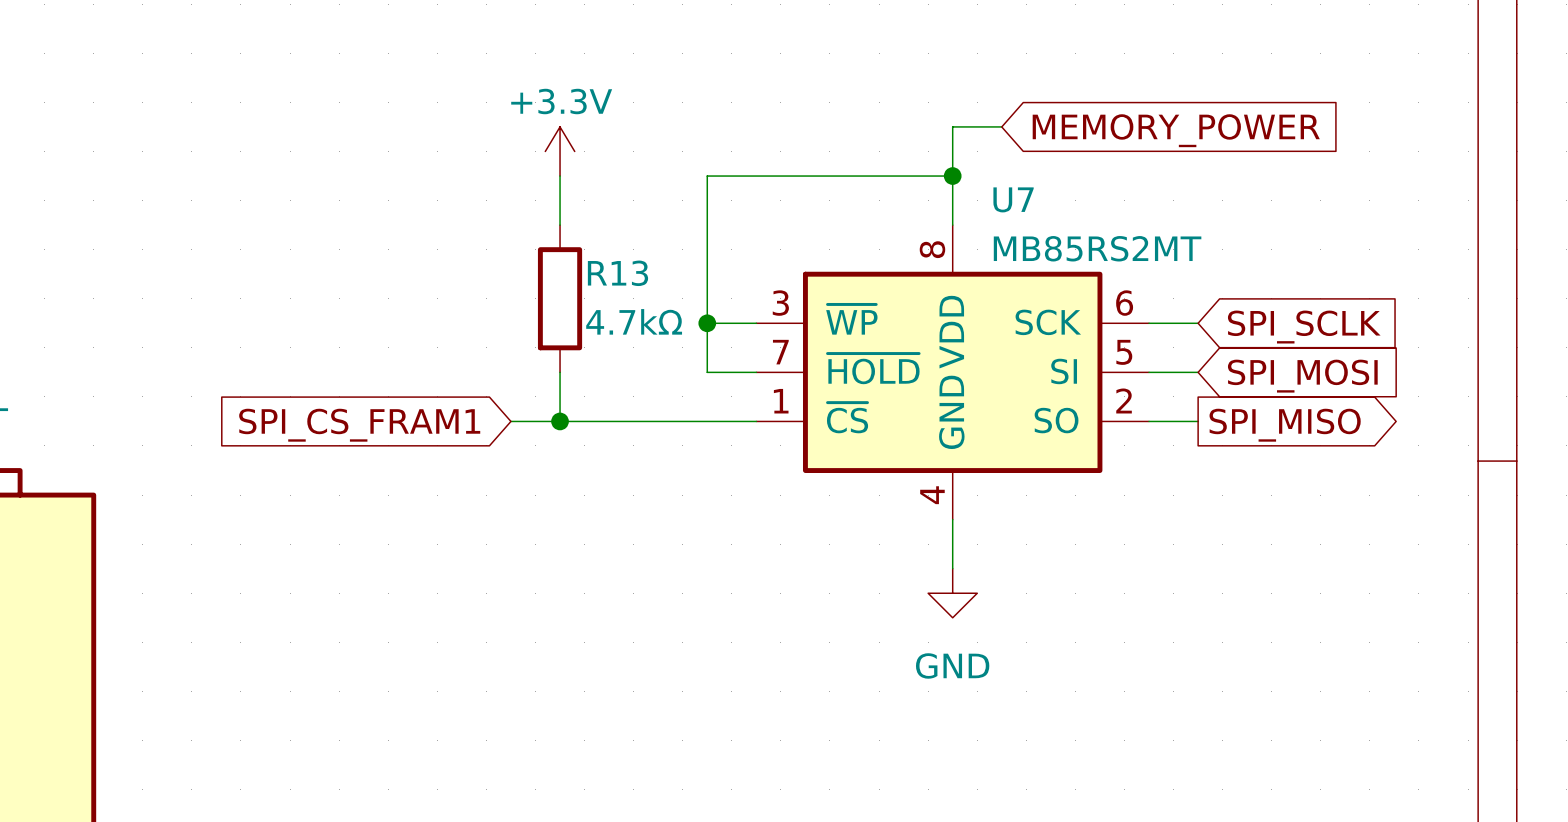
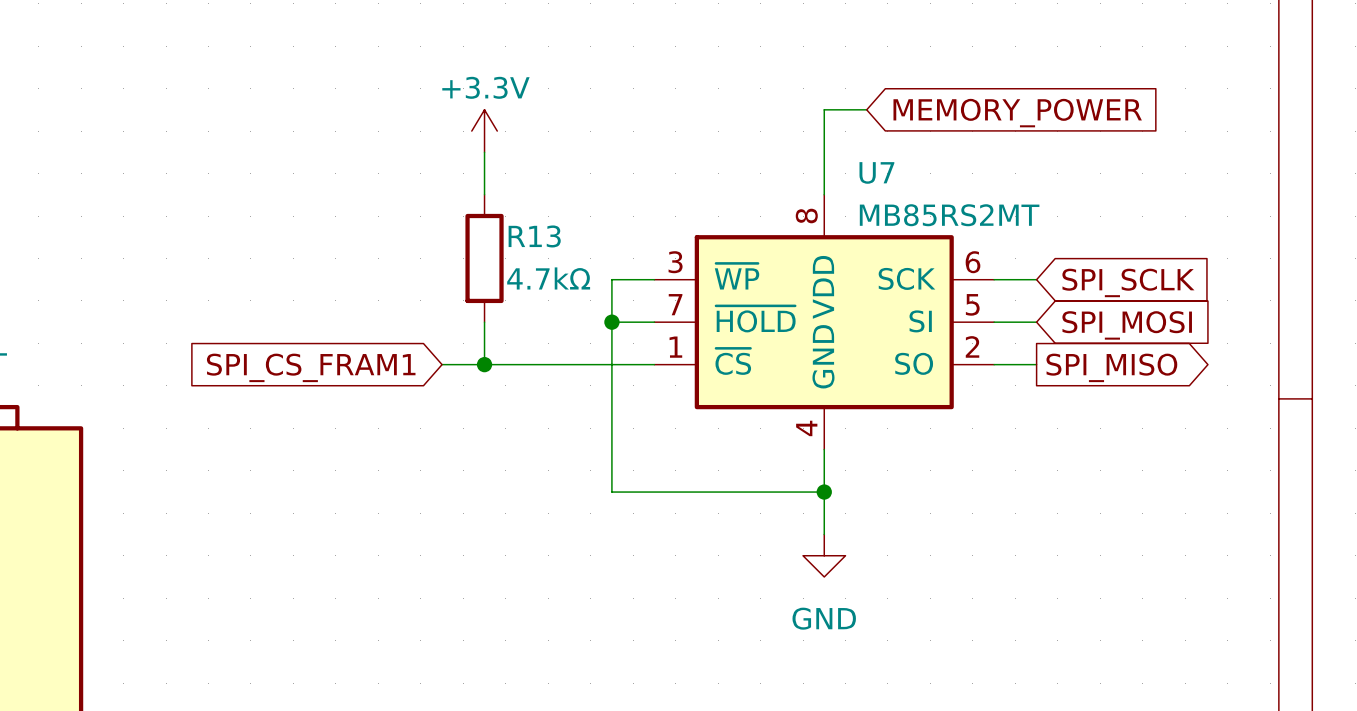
wire: (952, 176) (707, 176) (707, 323) -> none
junction: (952, 176) -> none
junction position: (707, 323) -> (611, 322)
wire: none -> (611, 322) (611, 492) (824, 492) (824, 534)
junction: none -> (824, 492)
power symbol position: GND (952, 593) -> GND (824, 555)

